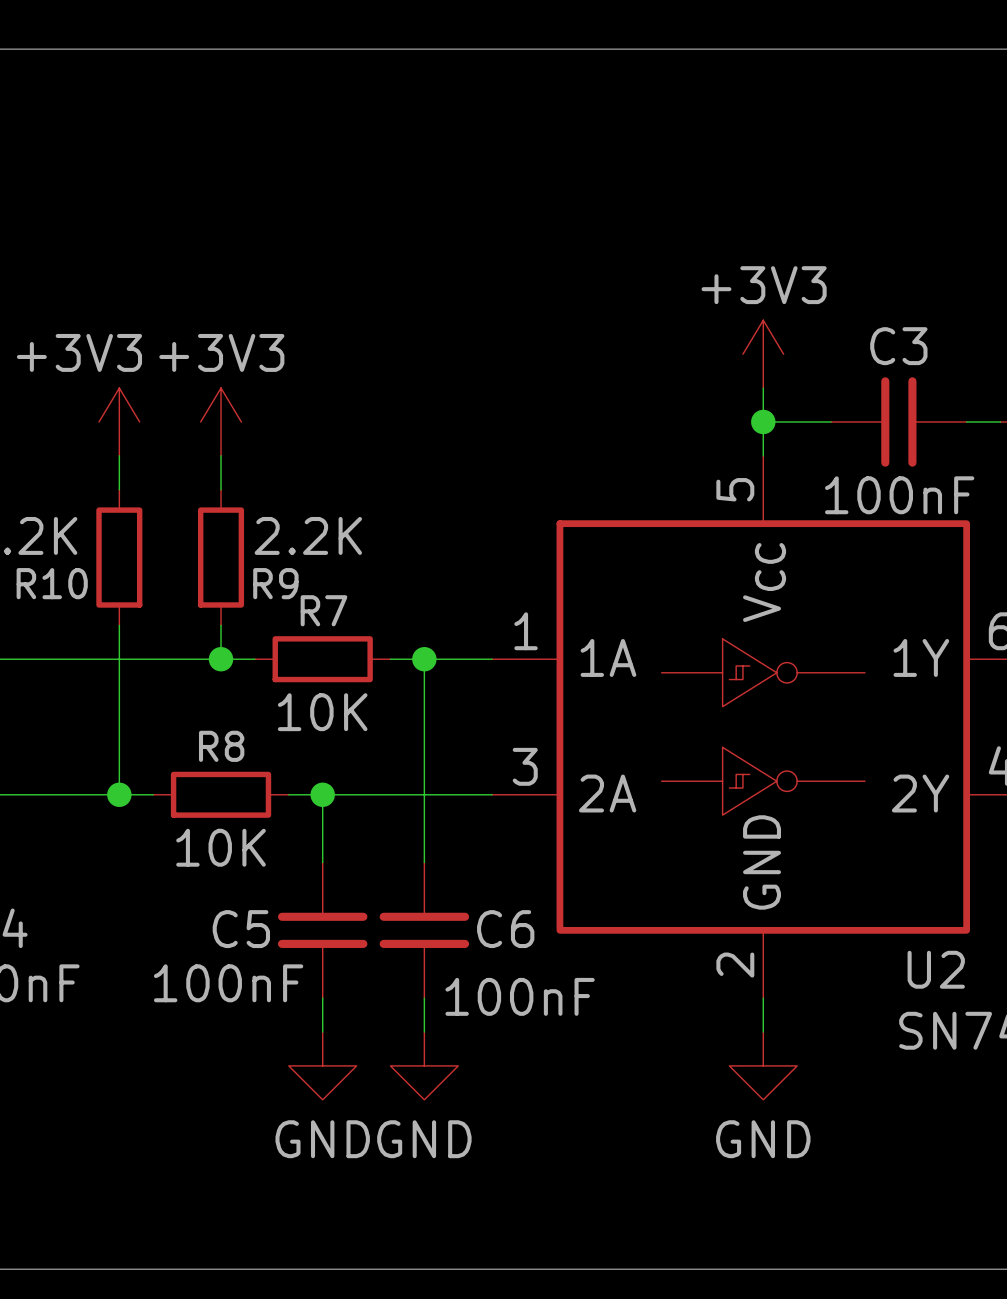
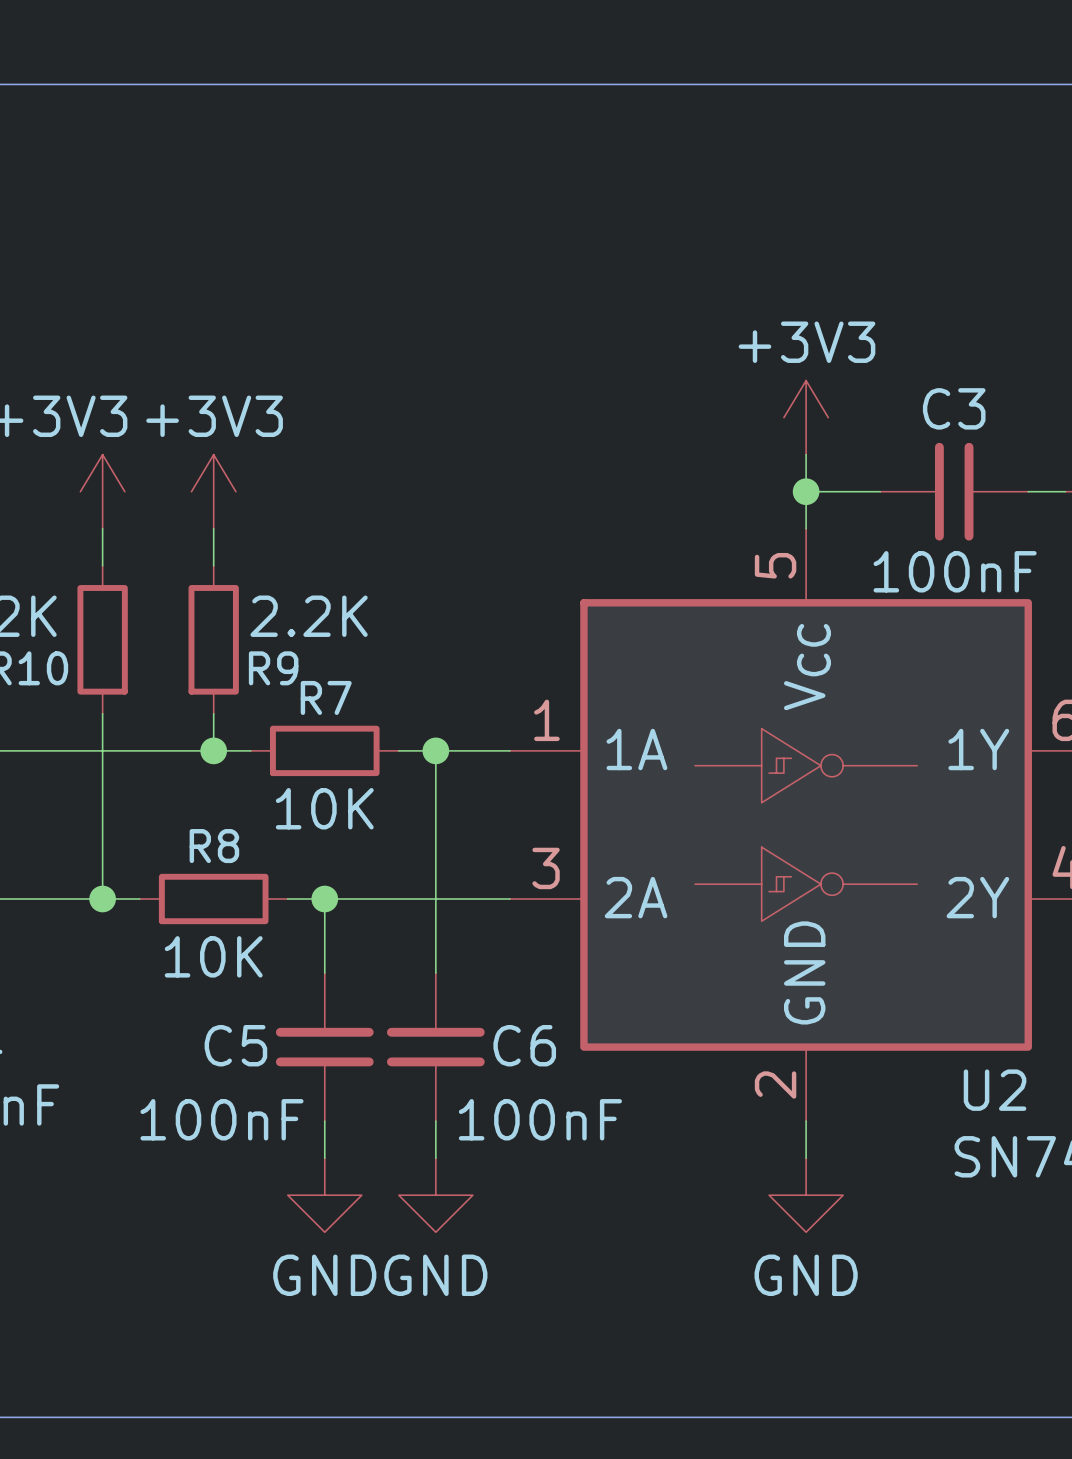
C5 value position: 100nF (228, 983) -> 100nF (221, 1119)

